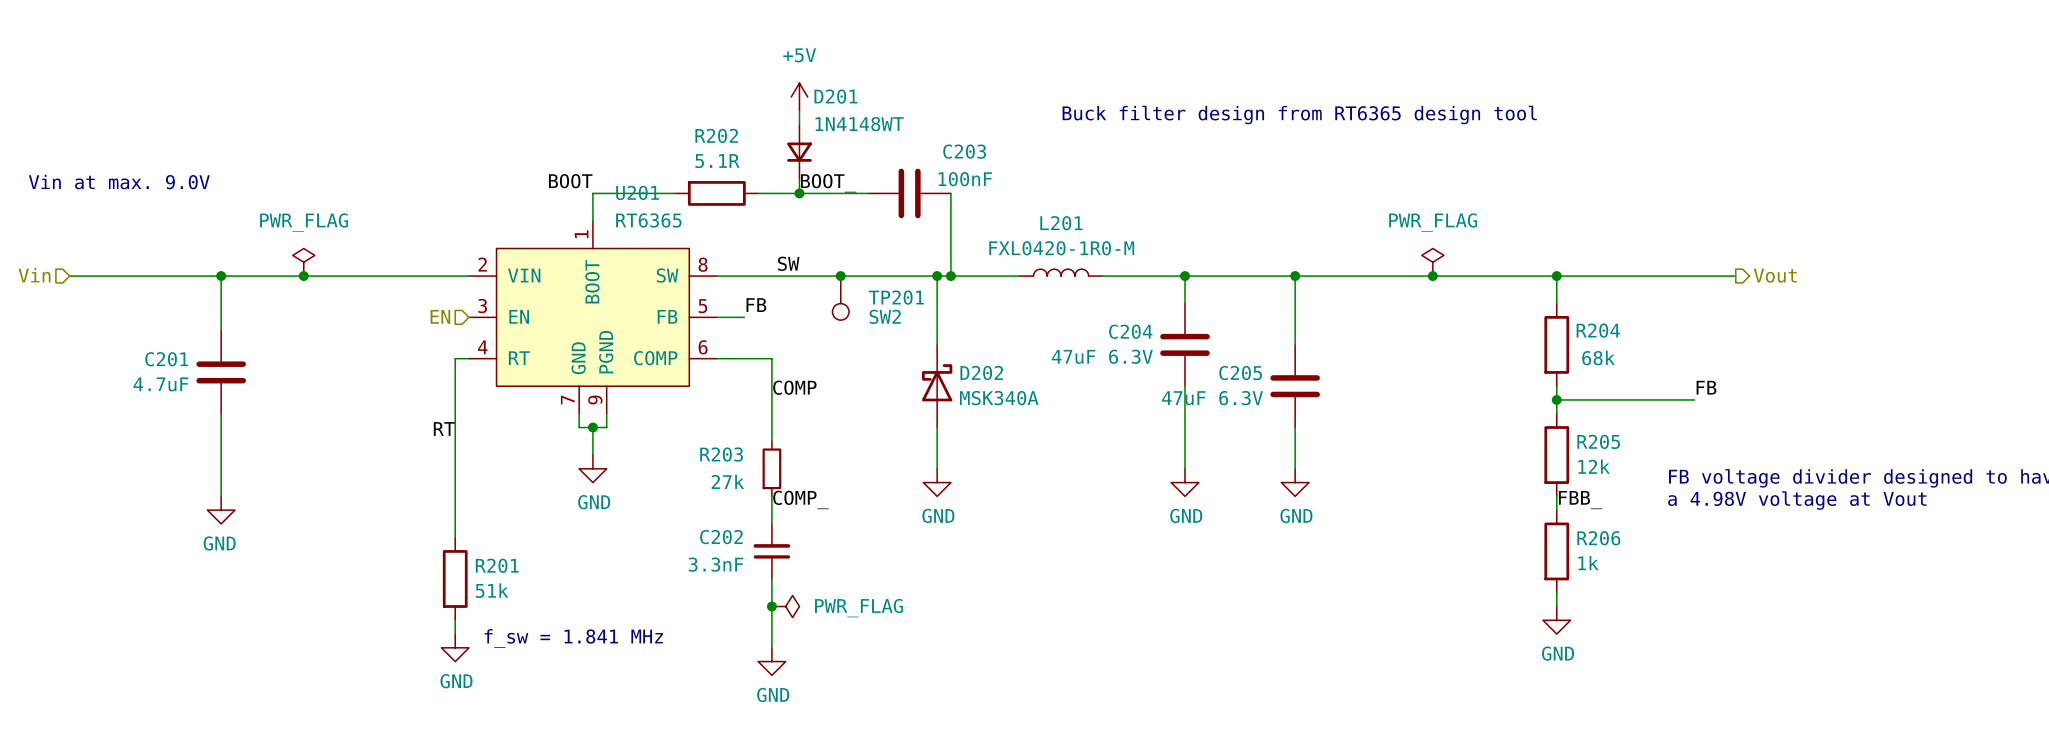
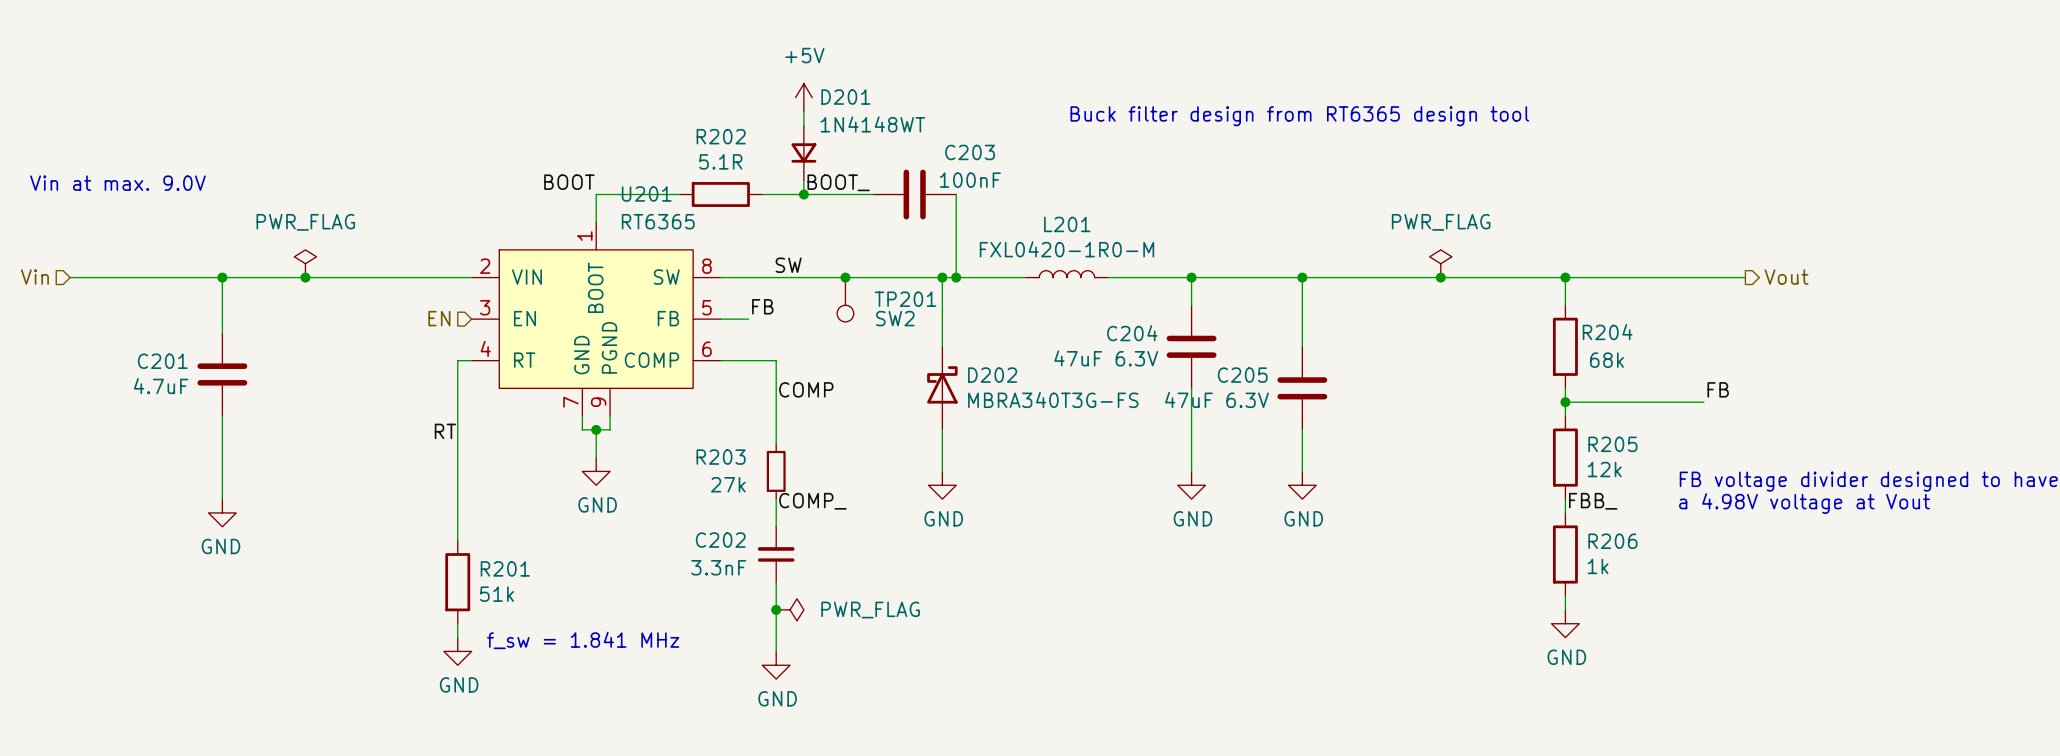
D202 value: MSK340A (999, 398) -> MBRA340T3G-FS (1053, 399)

